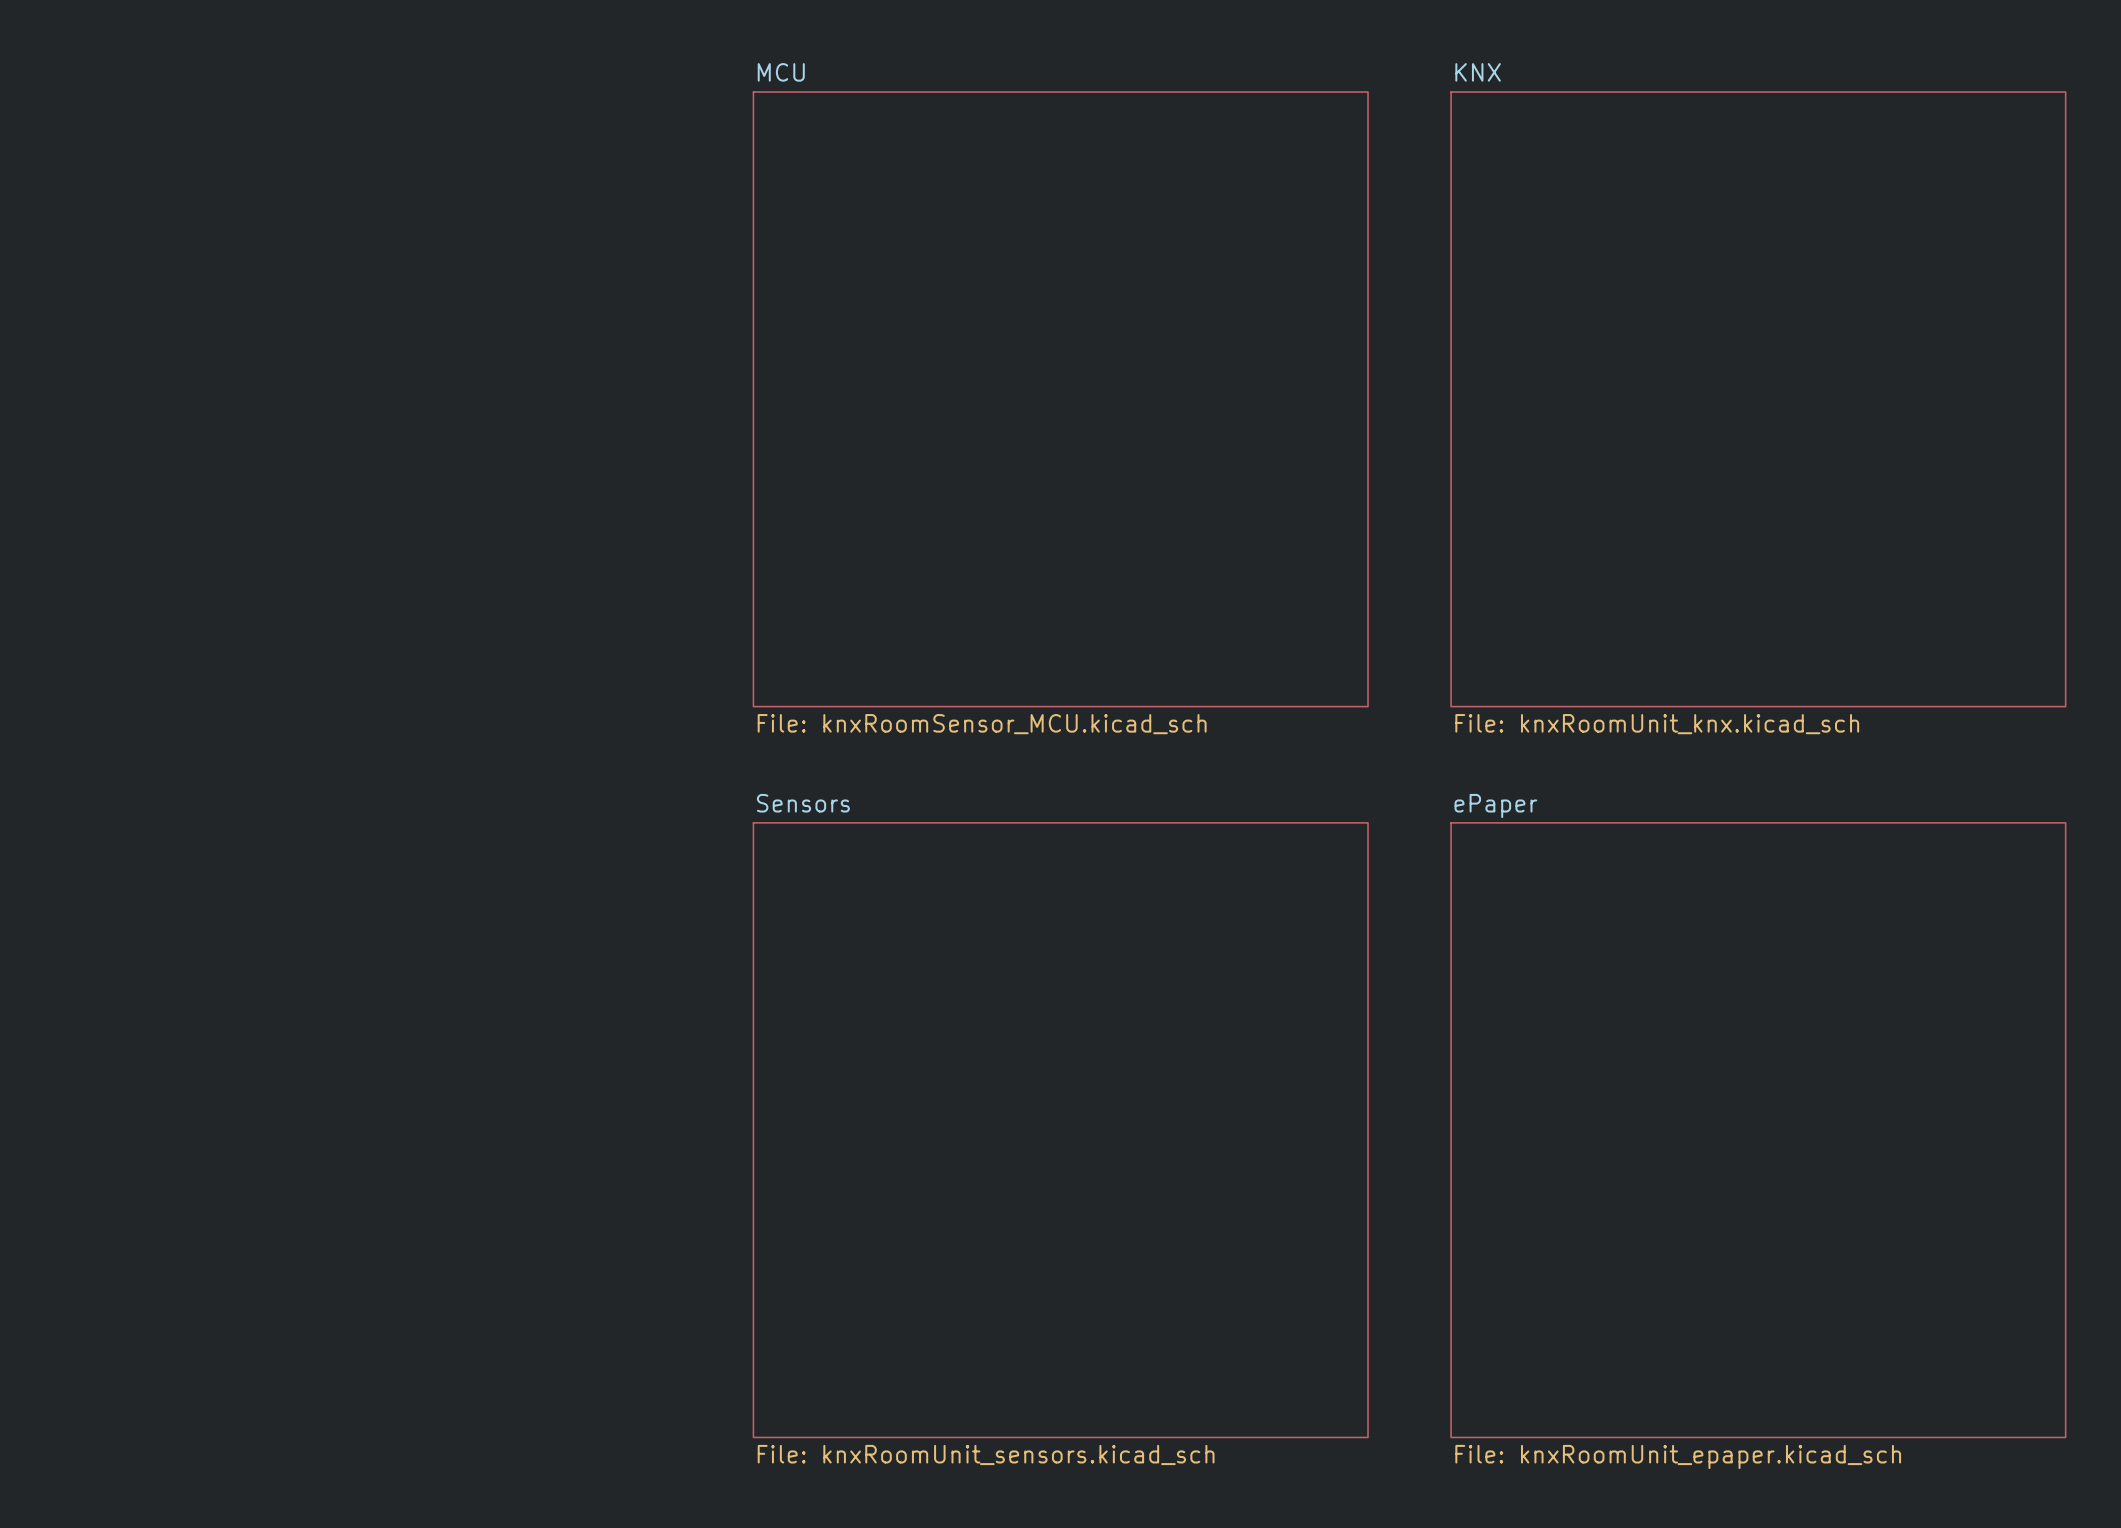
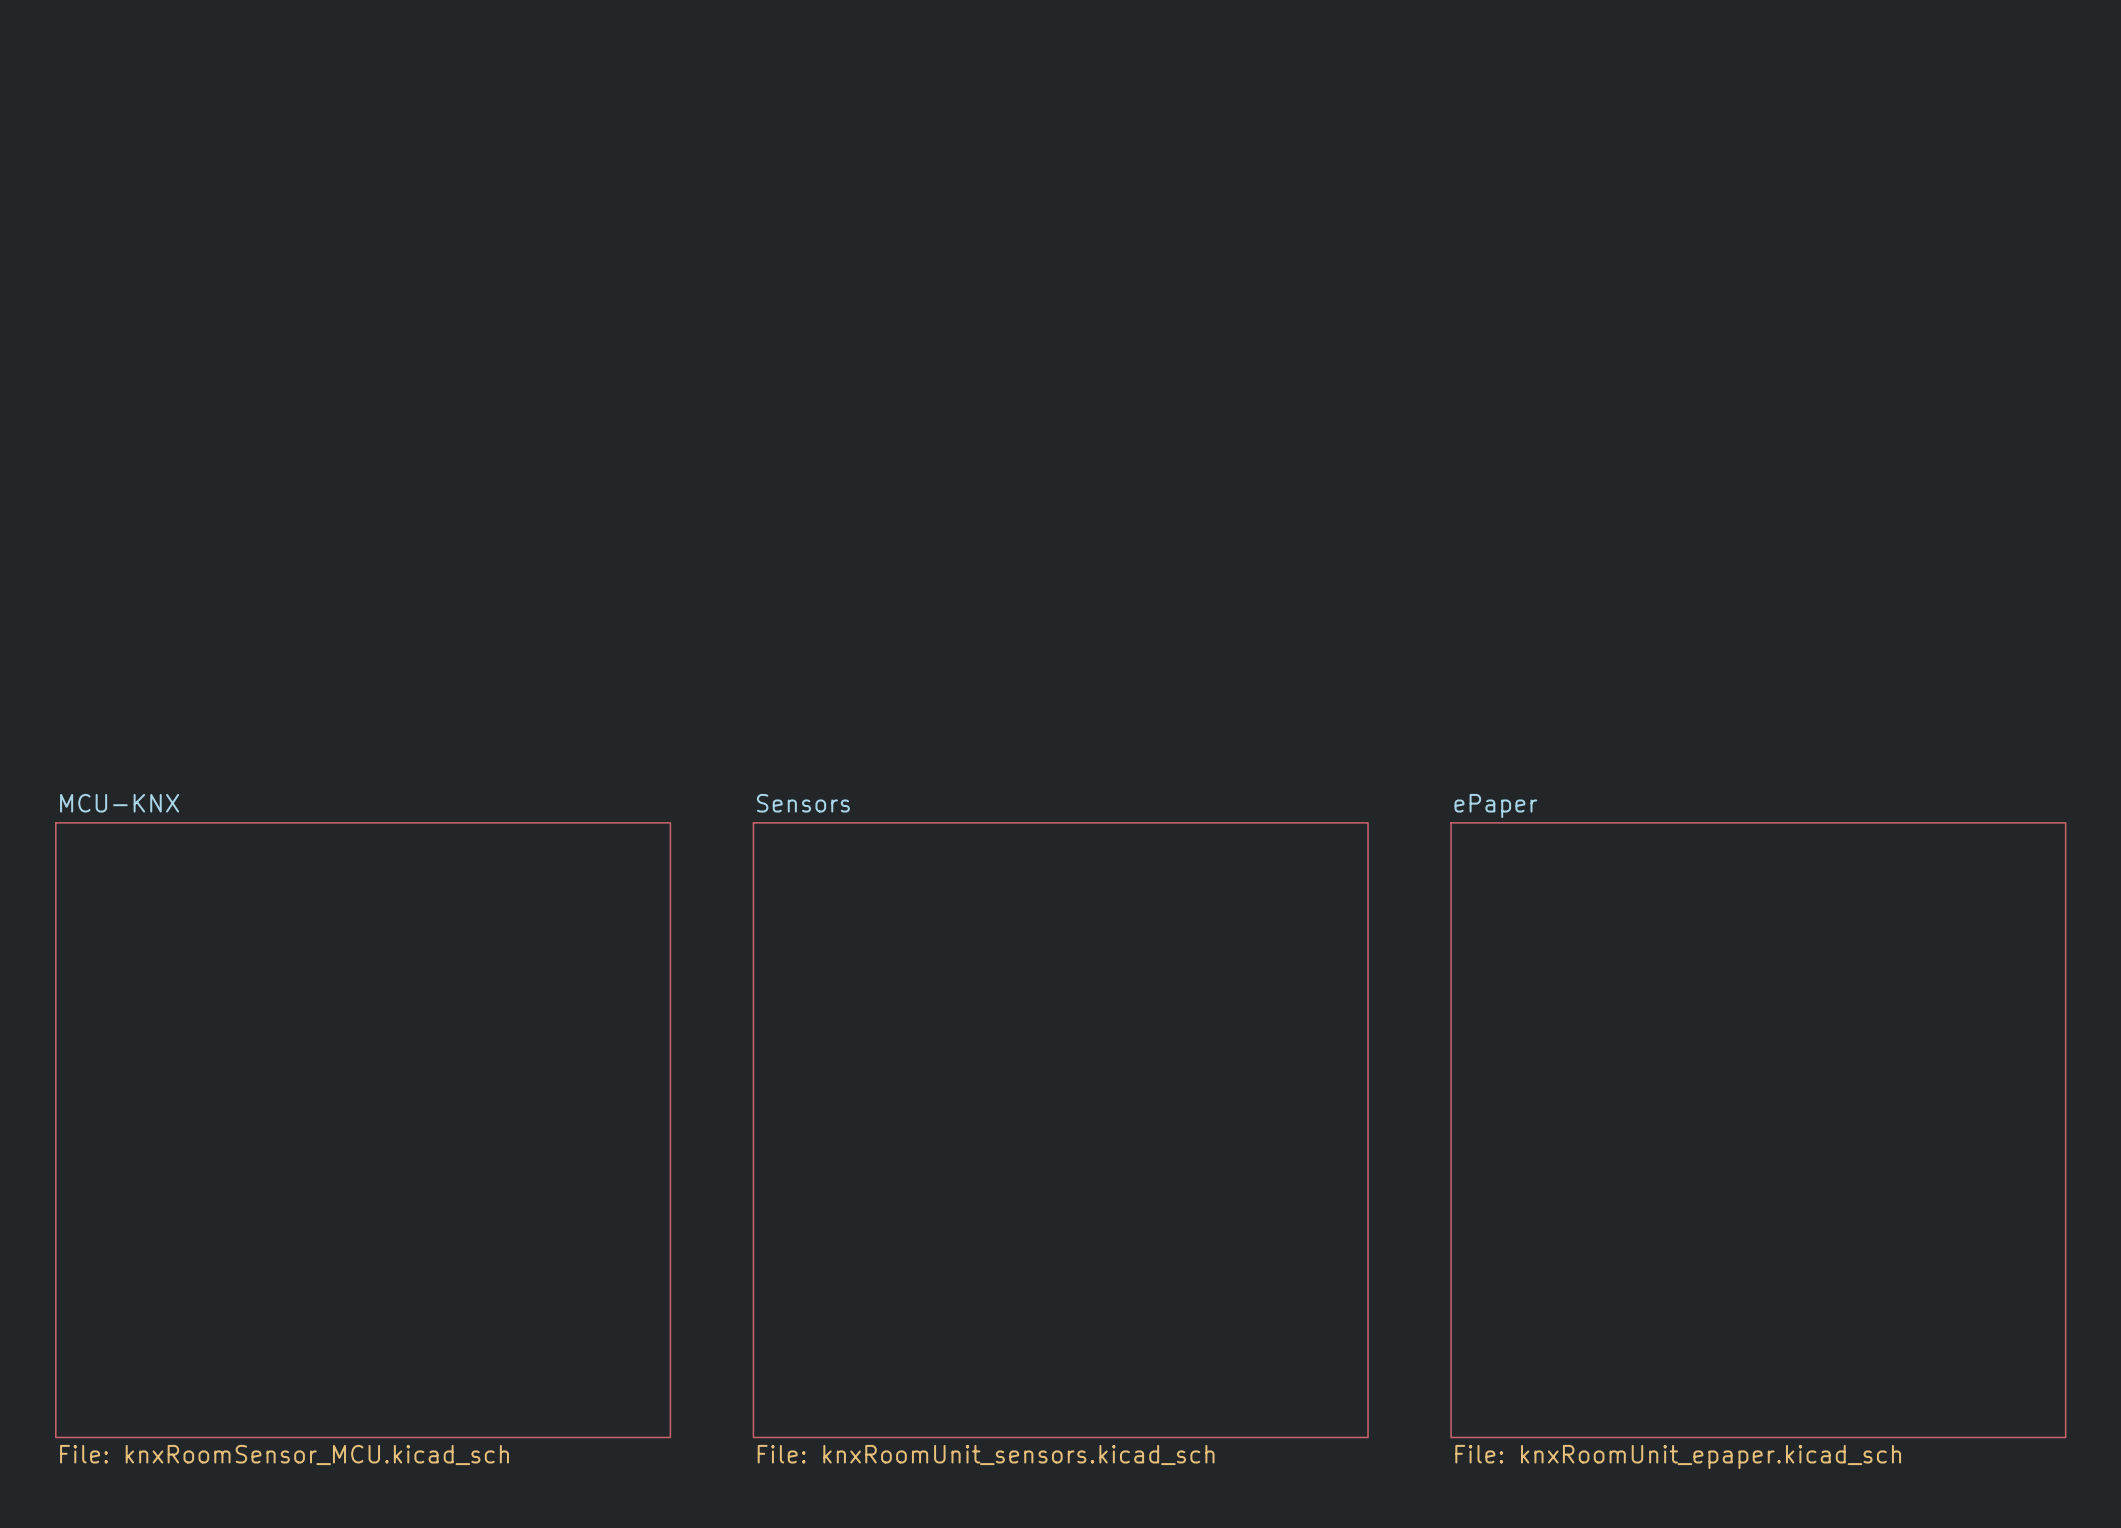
sheet MCU: File: knxRoomSensor_MCU.kicad_sch (1060, 399) -> none
sheet KNX: File: knxRoomUnit_knx.kicad_sch (1758, 399) -> none
sheet MCU-KNX: none -> File: knxRoomSensor_MCU.kicad_sch (363, 1130)

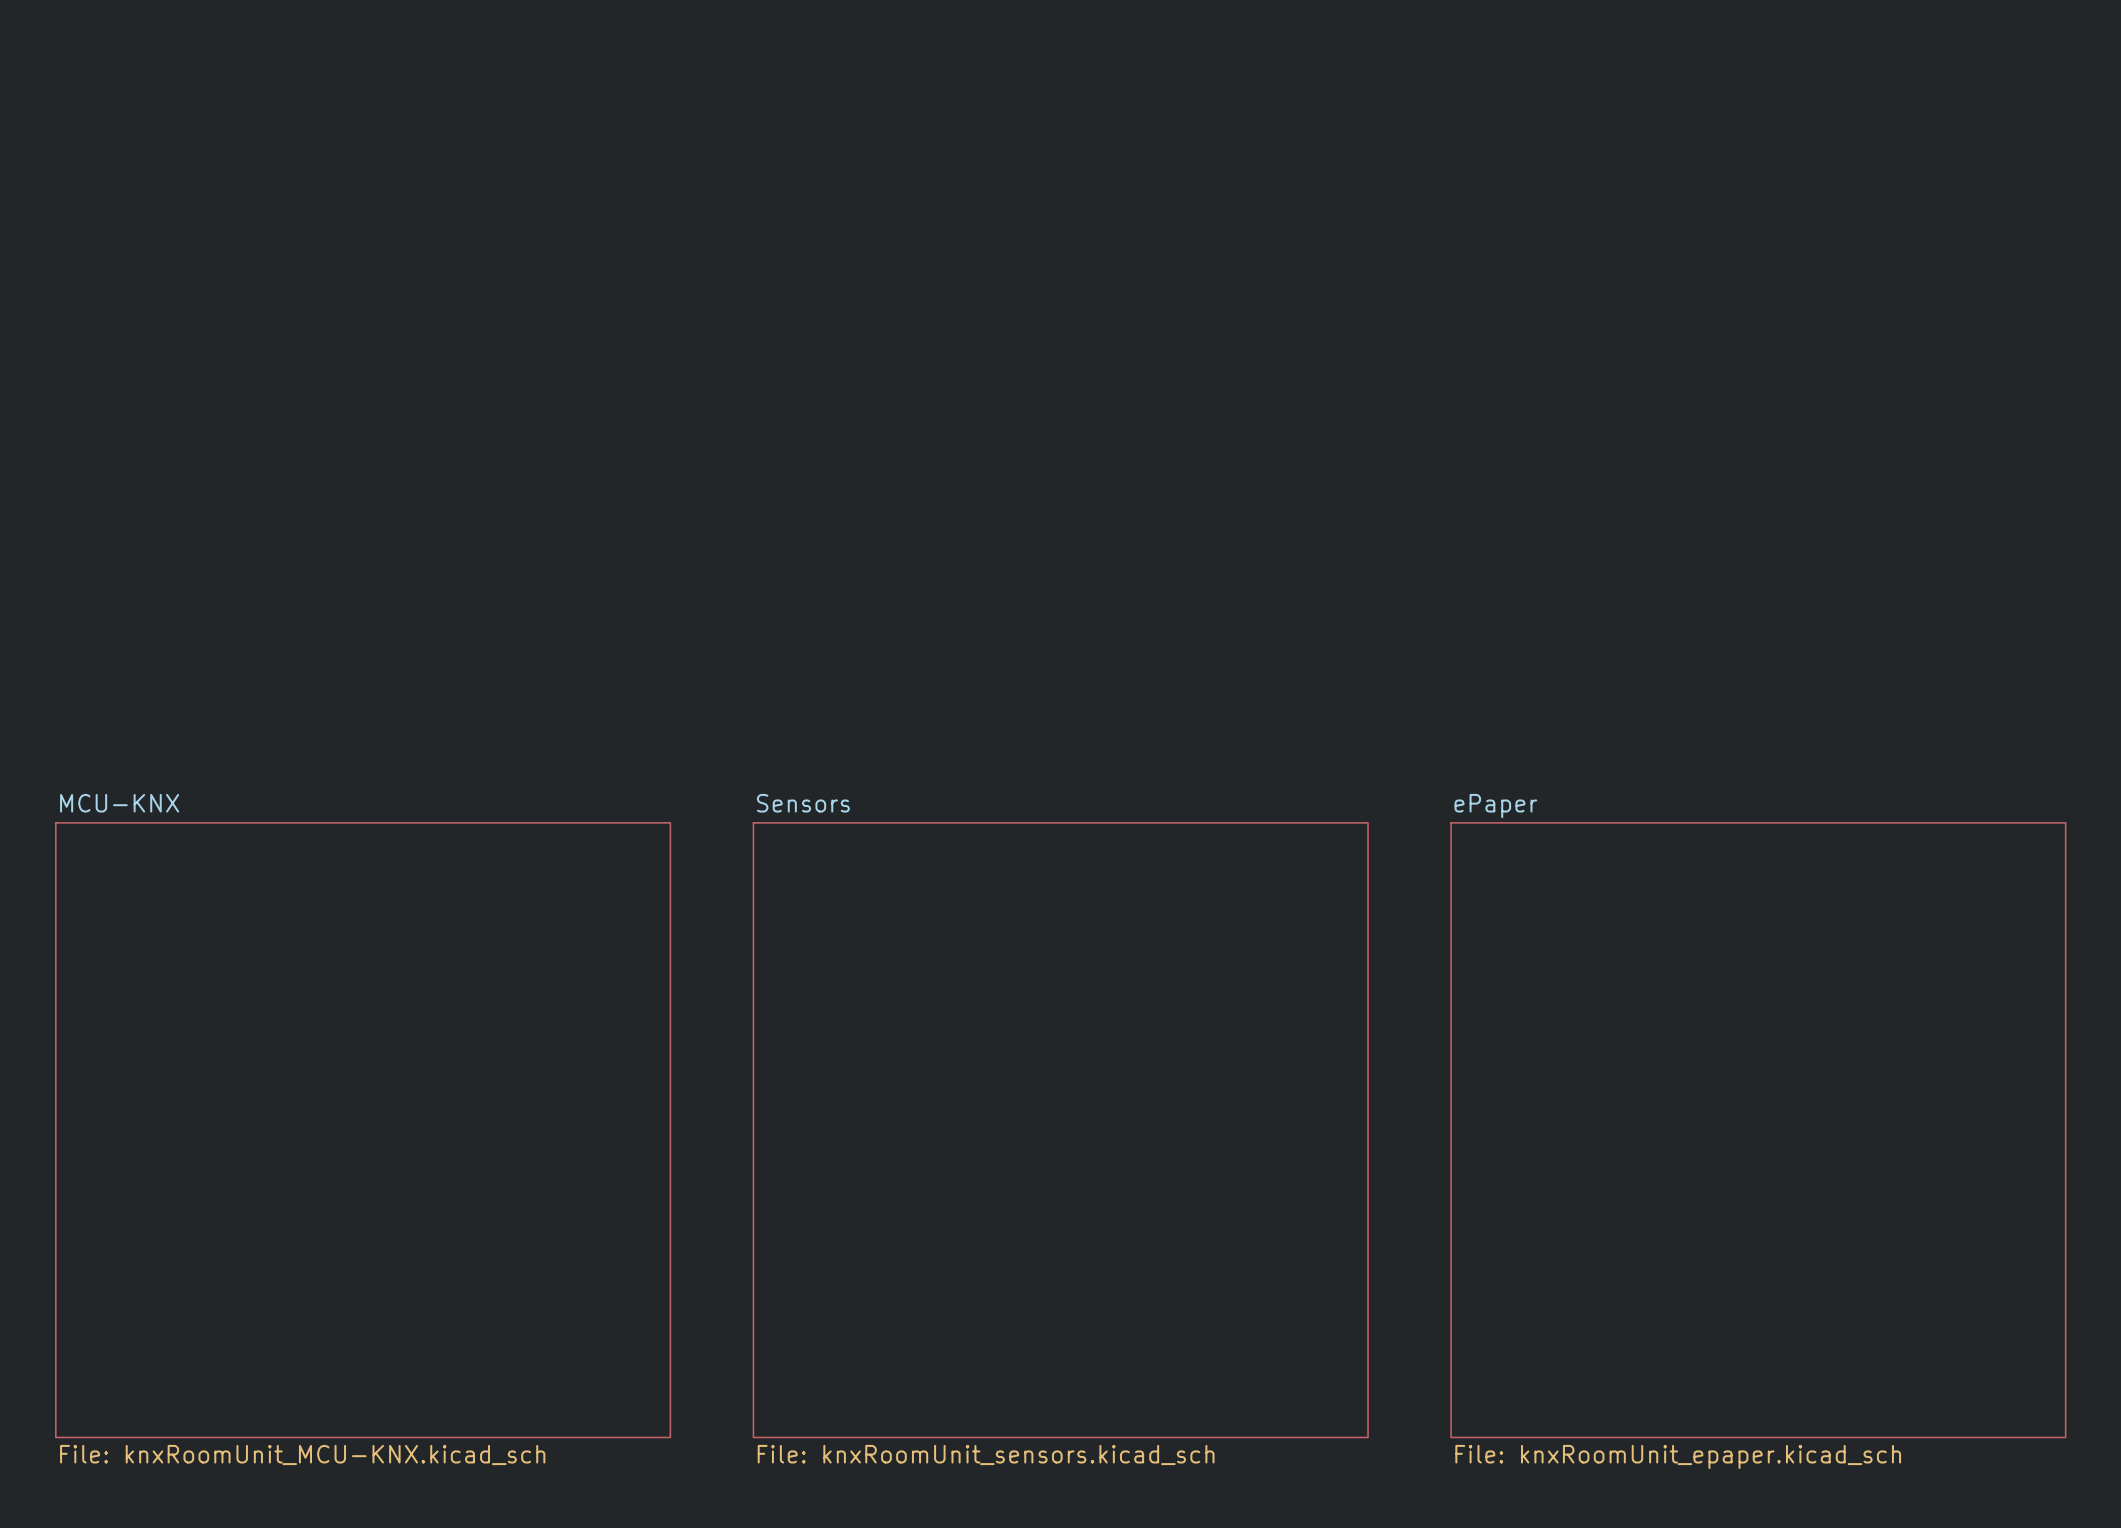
sheet MCU-KNX value: File: knxRoomSensor_MCU.kicad_sch (284, 1454) -> File: knxRoomUnit_MCU-KNX.kicad_sch (302, 1454)

